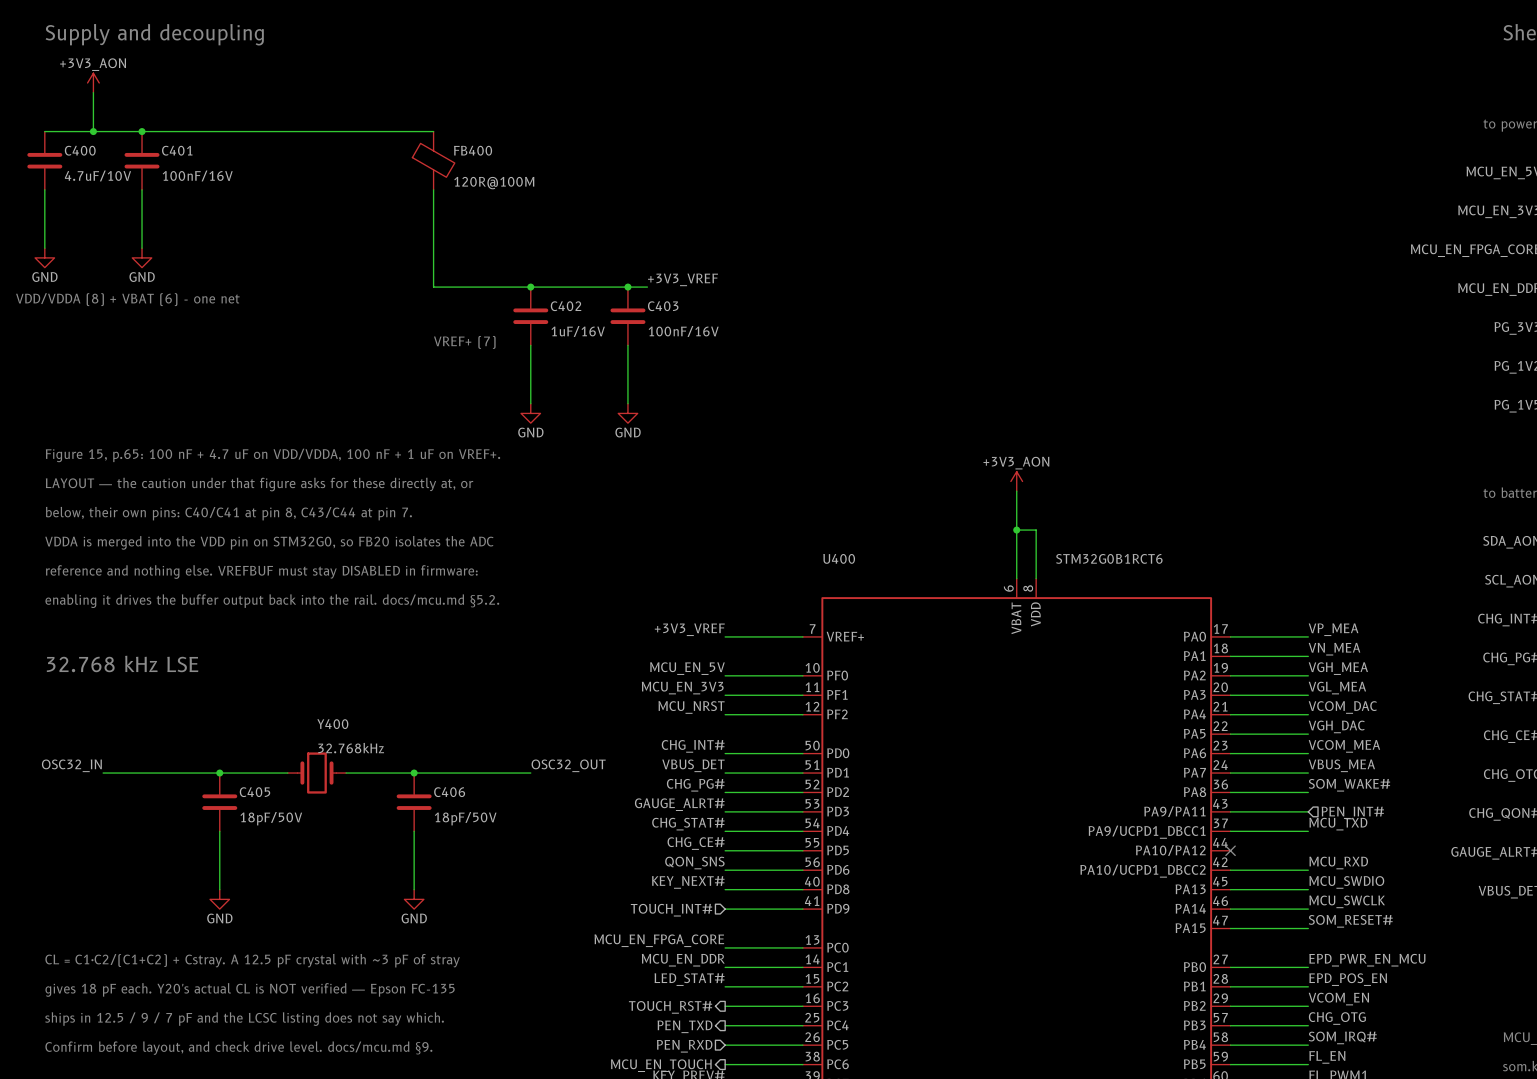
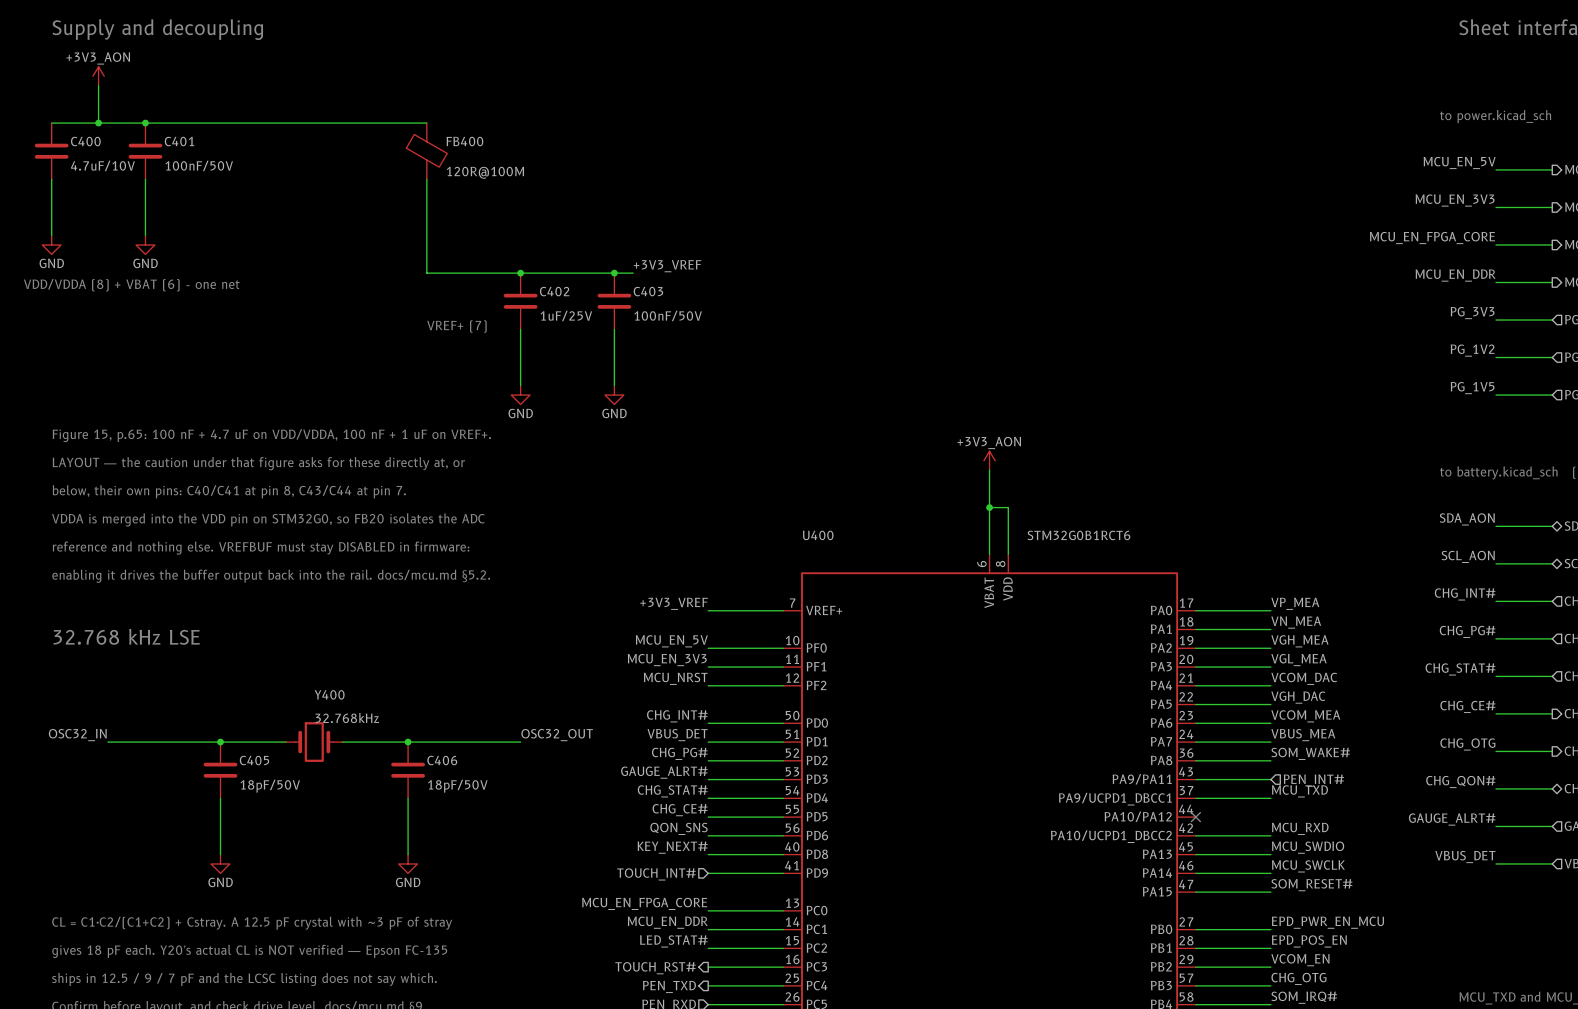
C401 value: 100nF/16V (197, 175) -> 100nF/50V (199, 165)
C402 value: 1uF/16V (578, 331) -> 1uF/25V (566, 315)
C403 value: 100nF/16V (683, 331) -> 100nF/50V (668, 315)

